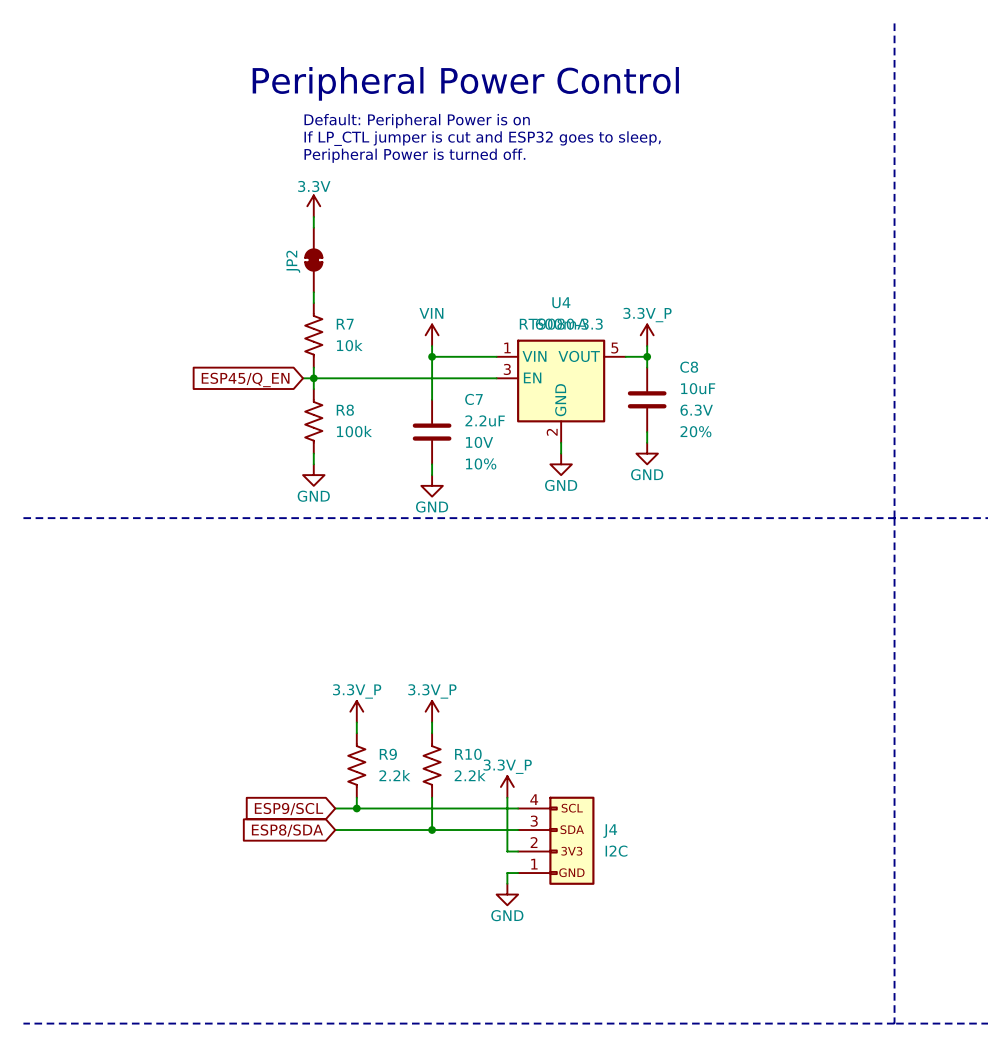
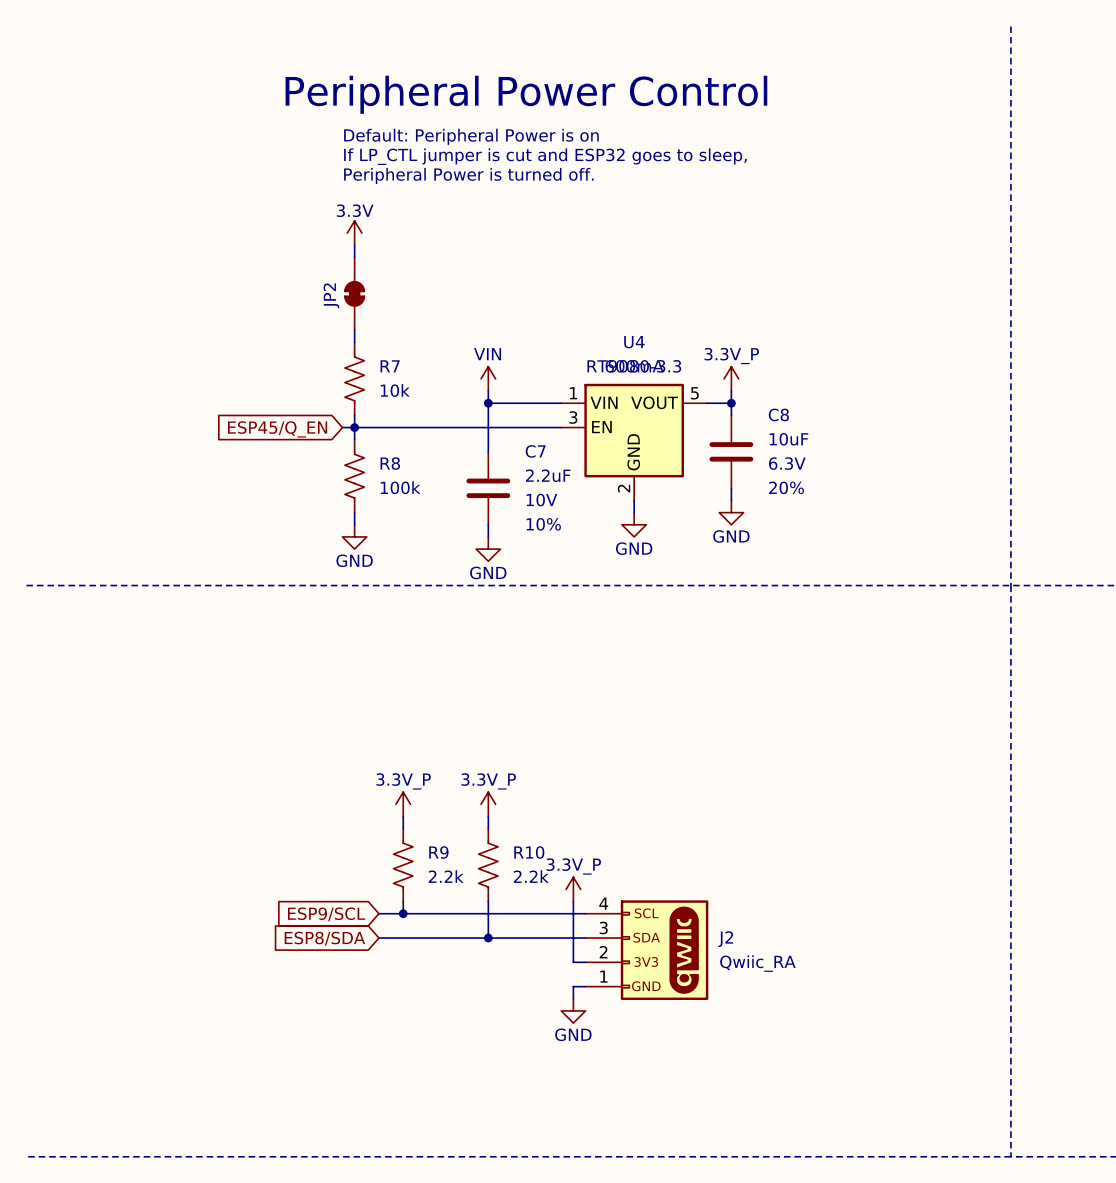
J4: I2C (556, 840) -> none
J2: none -> Qwiic_RA (646, 950)

